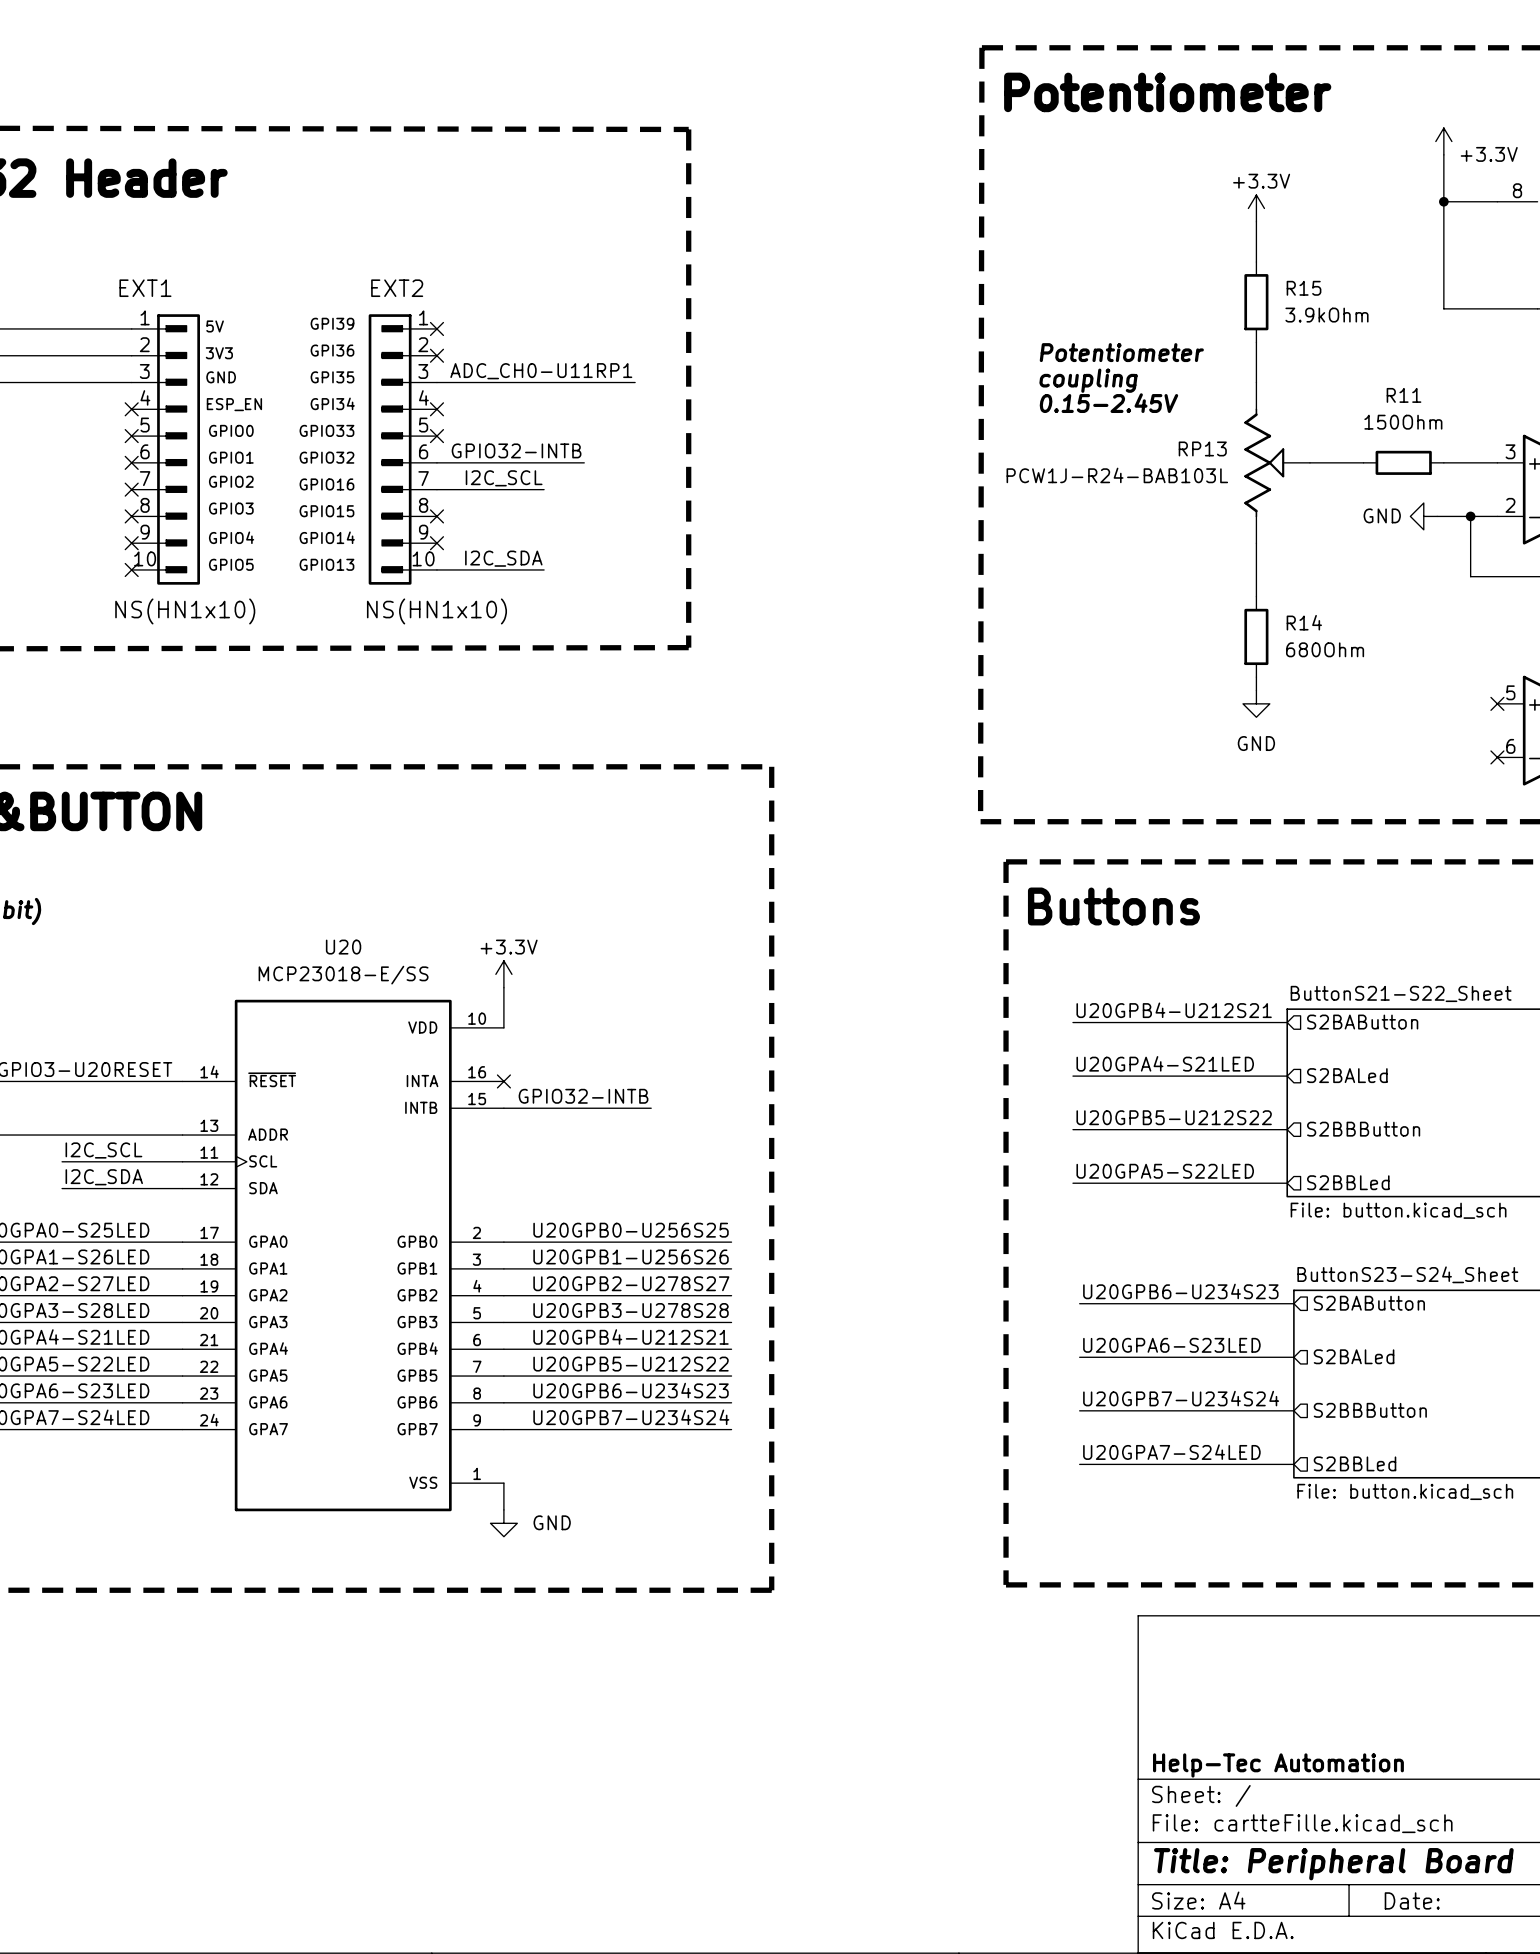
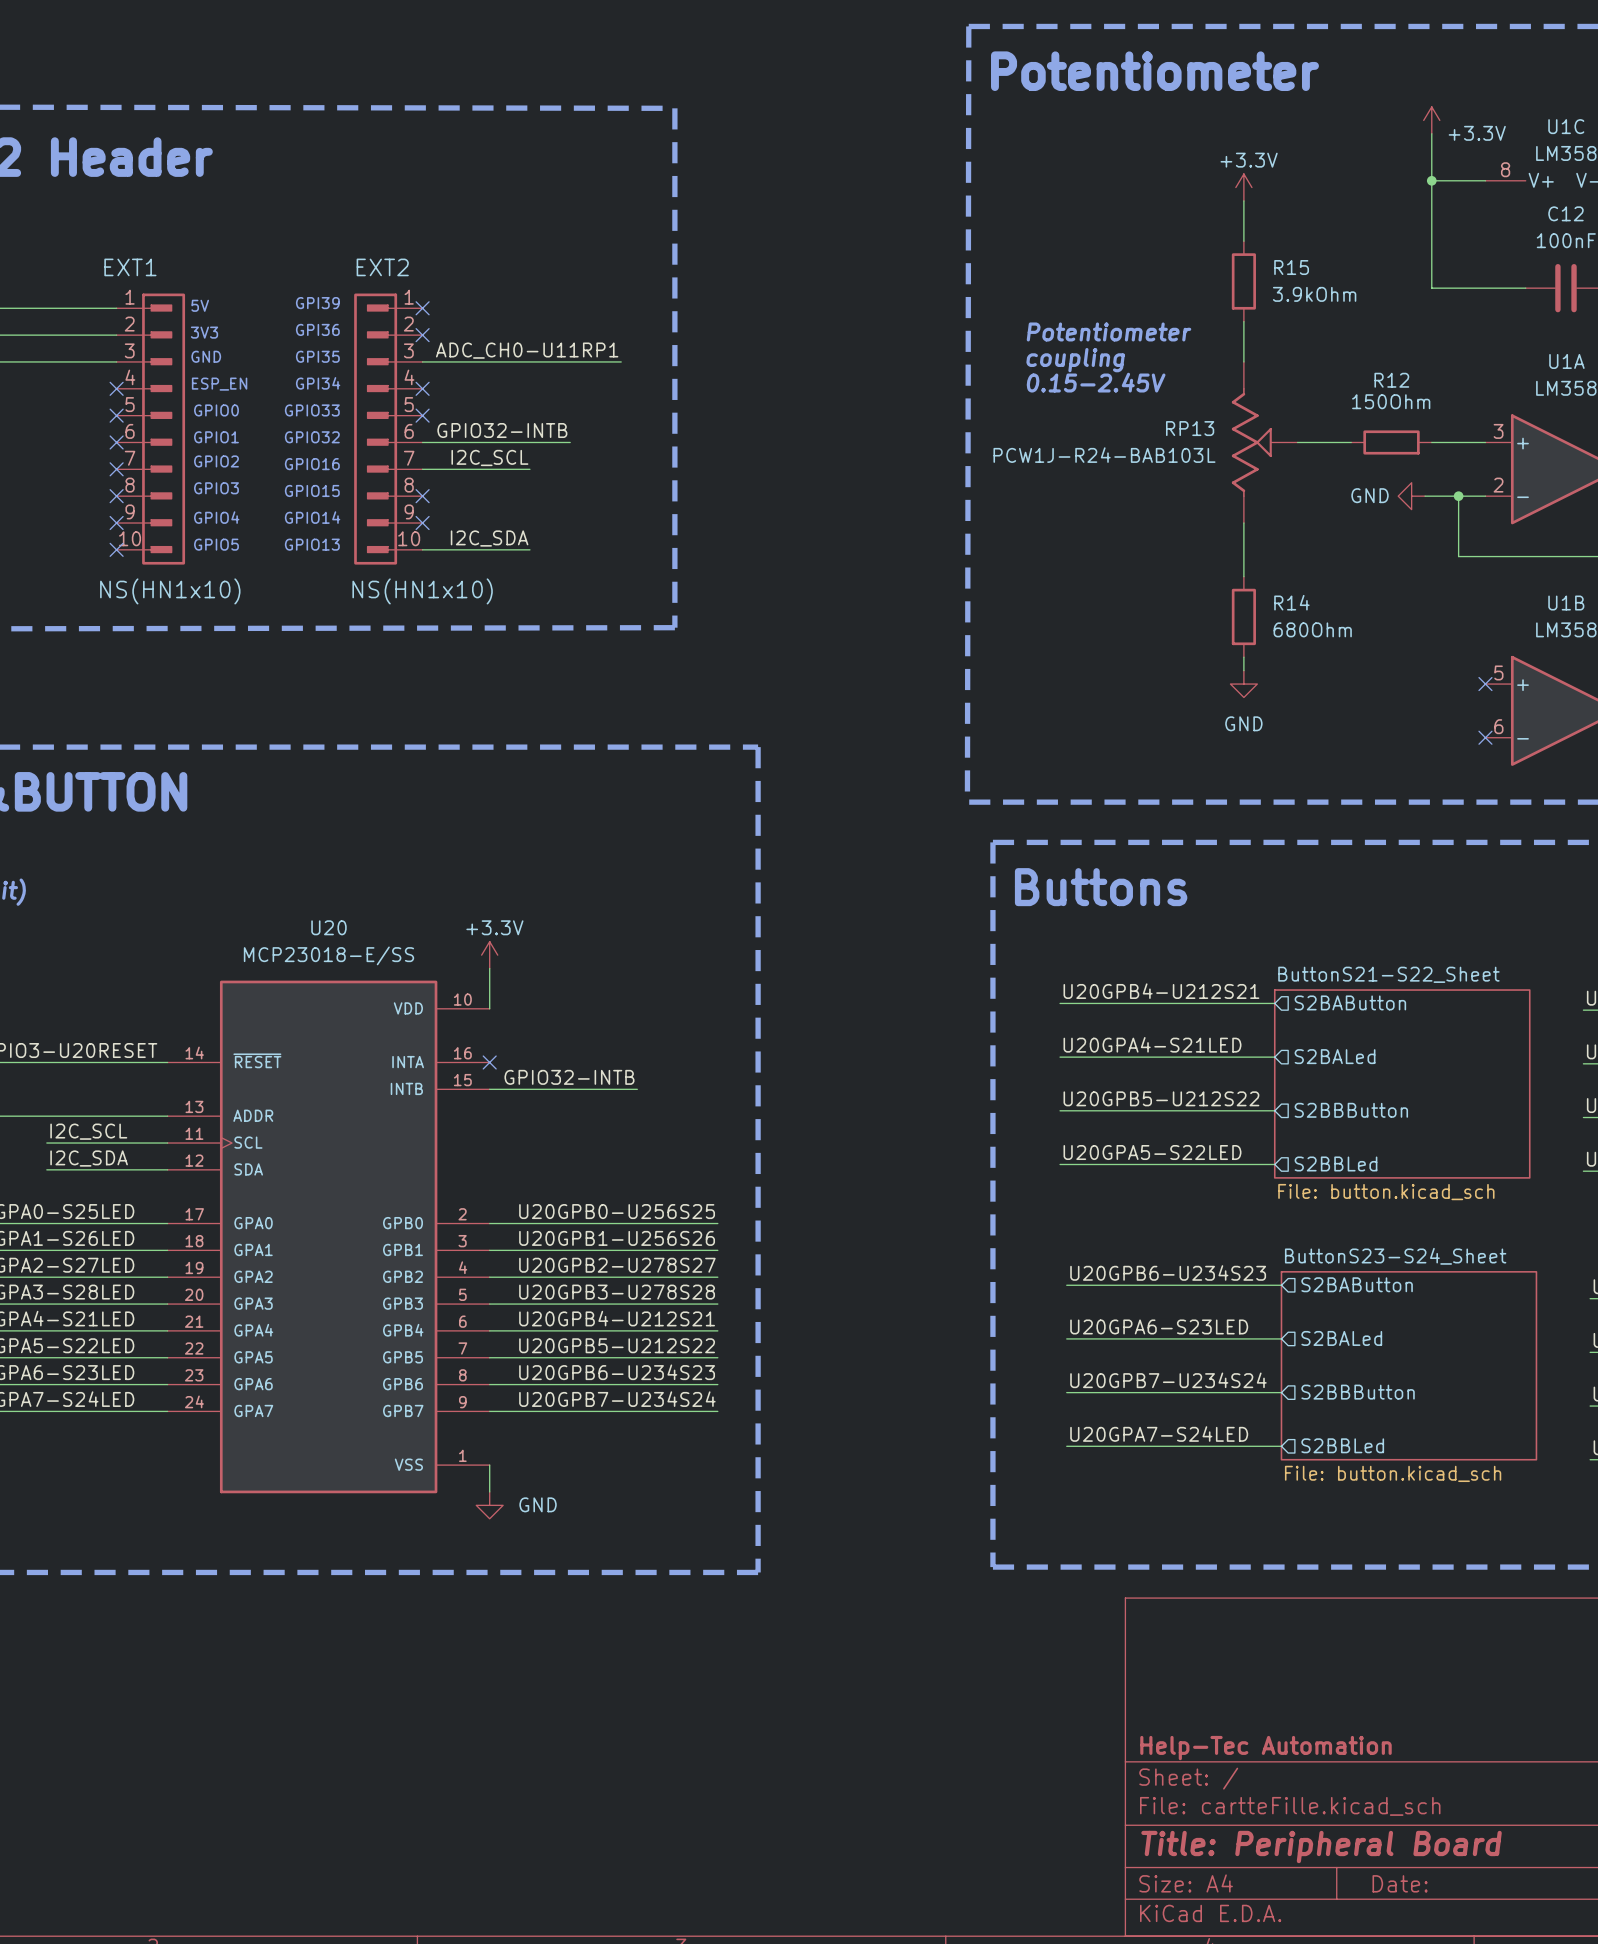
R11 name: R11 (1404, 395) -> R12 (1391, 380)

